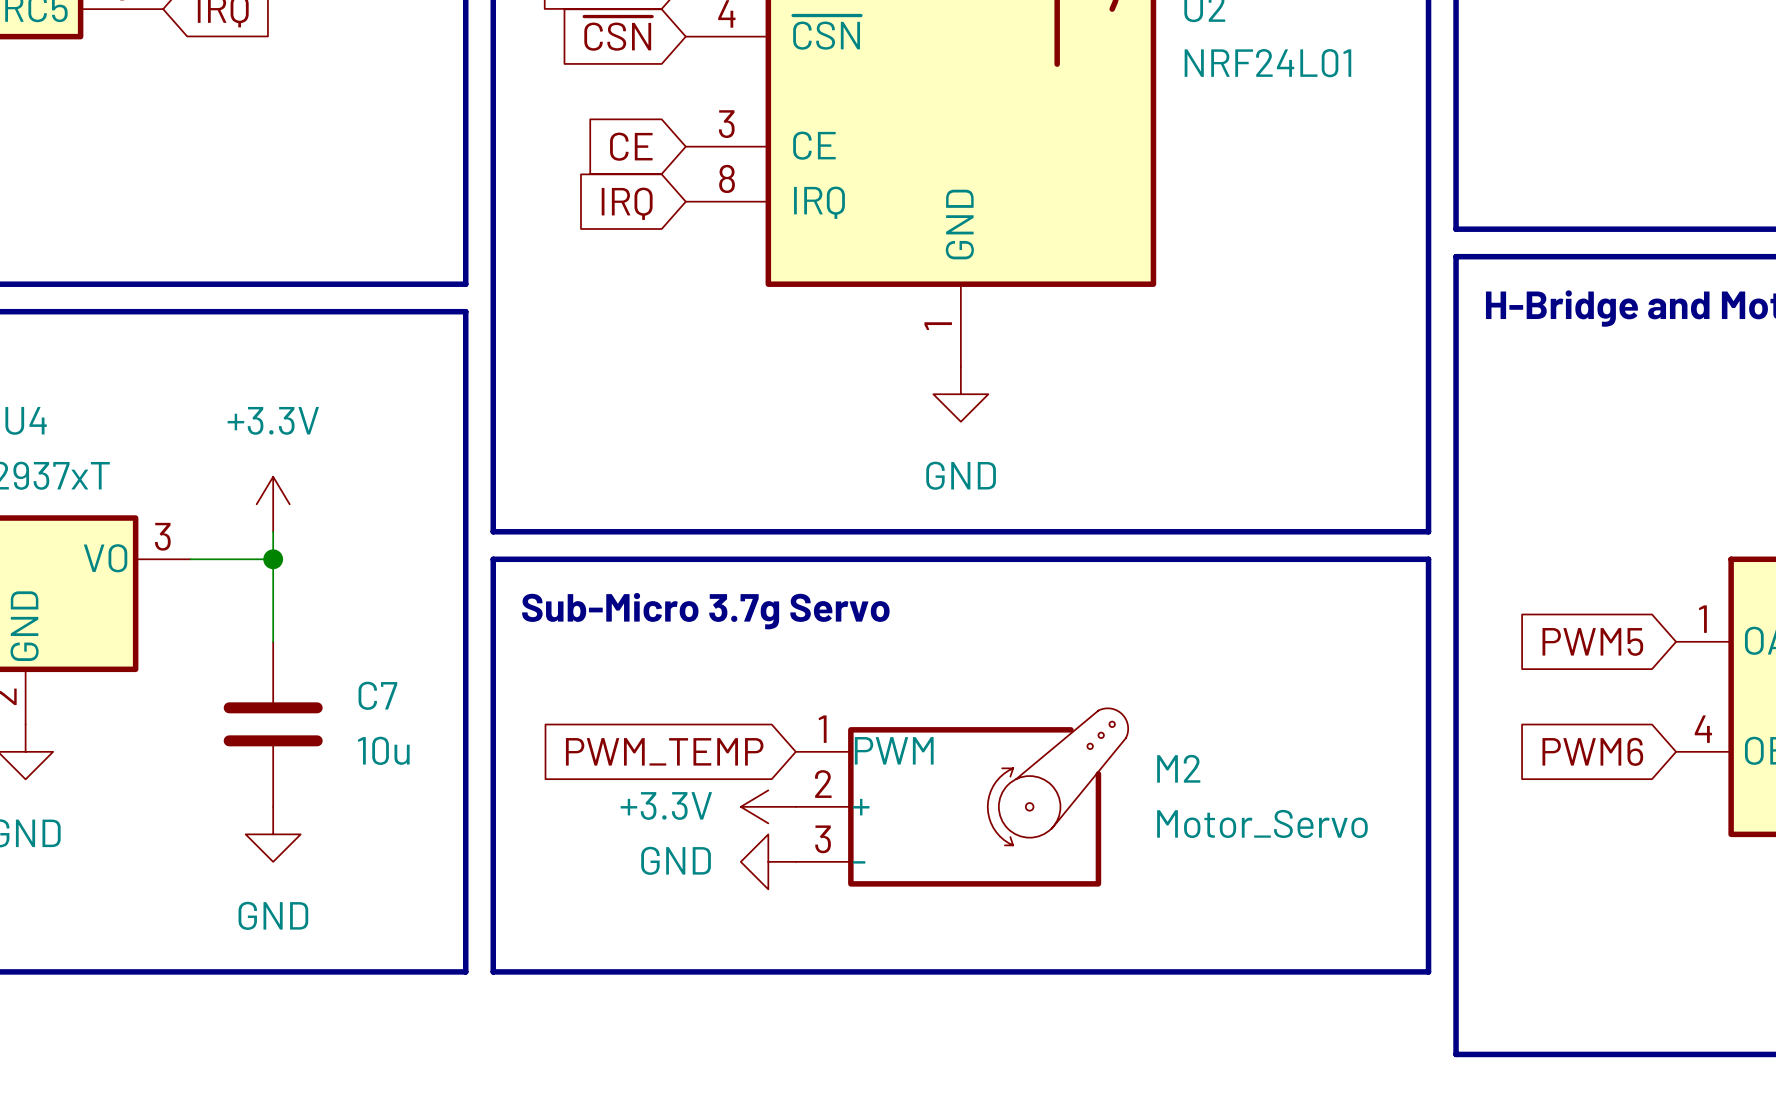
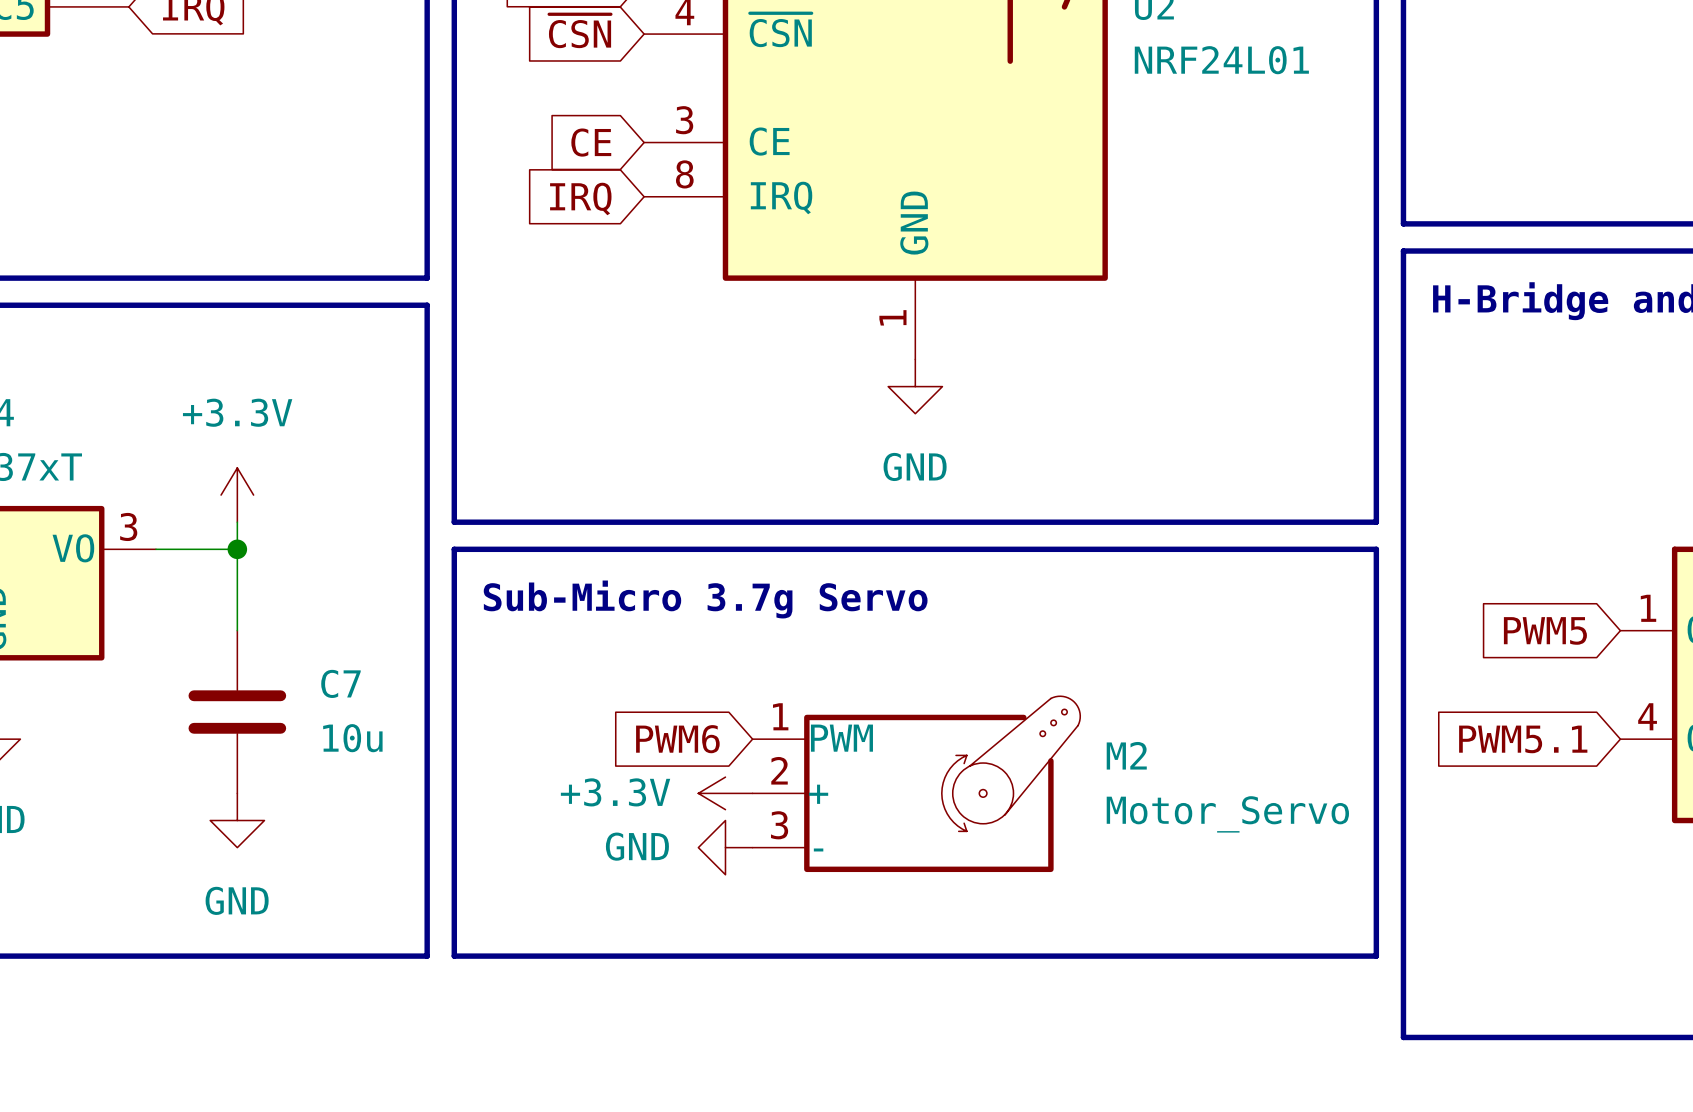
global label: PWM_TEMP (664, 751) -> PWM6 (677, 739)
global label: PWM6 (1592, 751) -> PWM5.1 (1523, 739)

